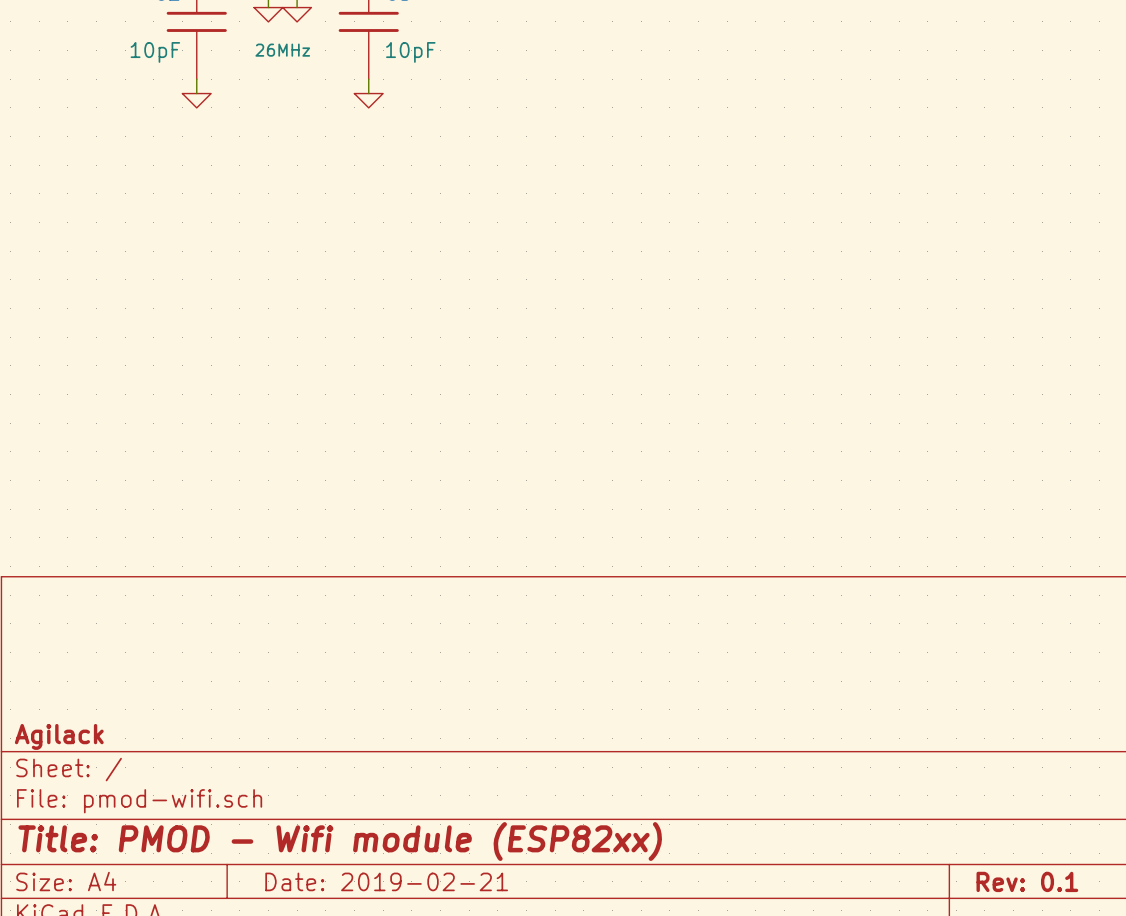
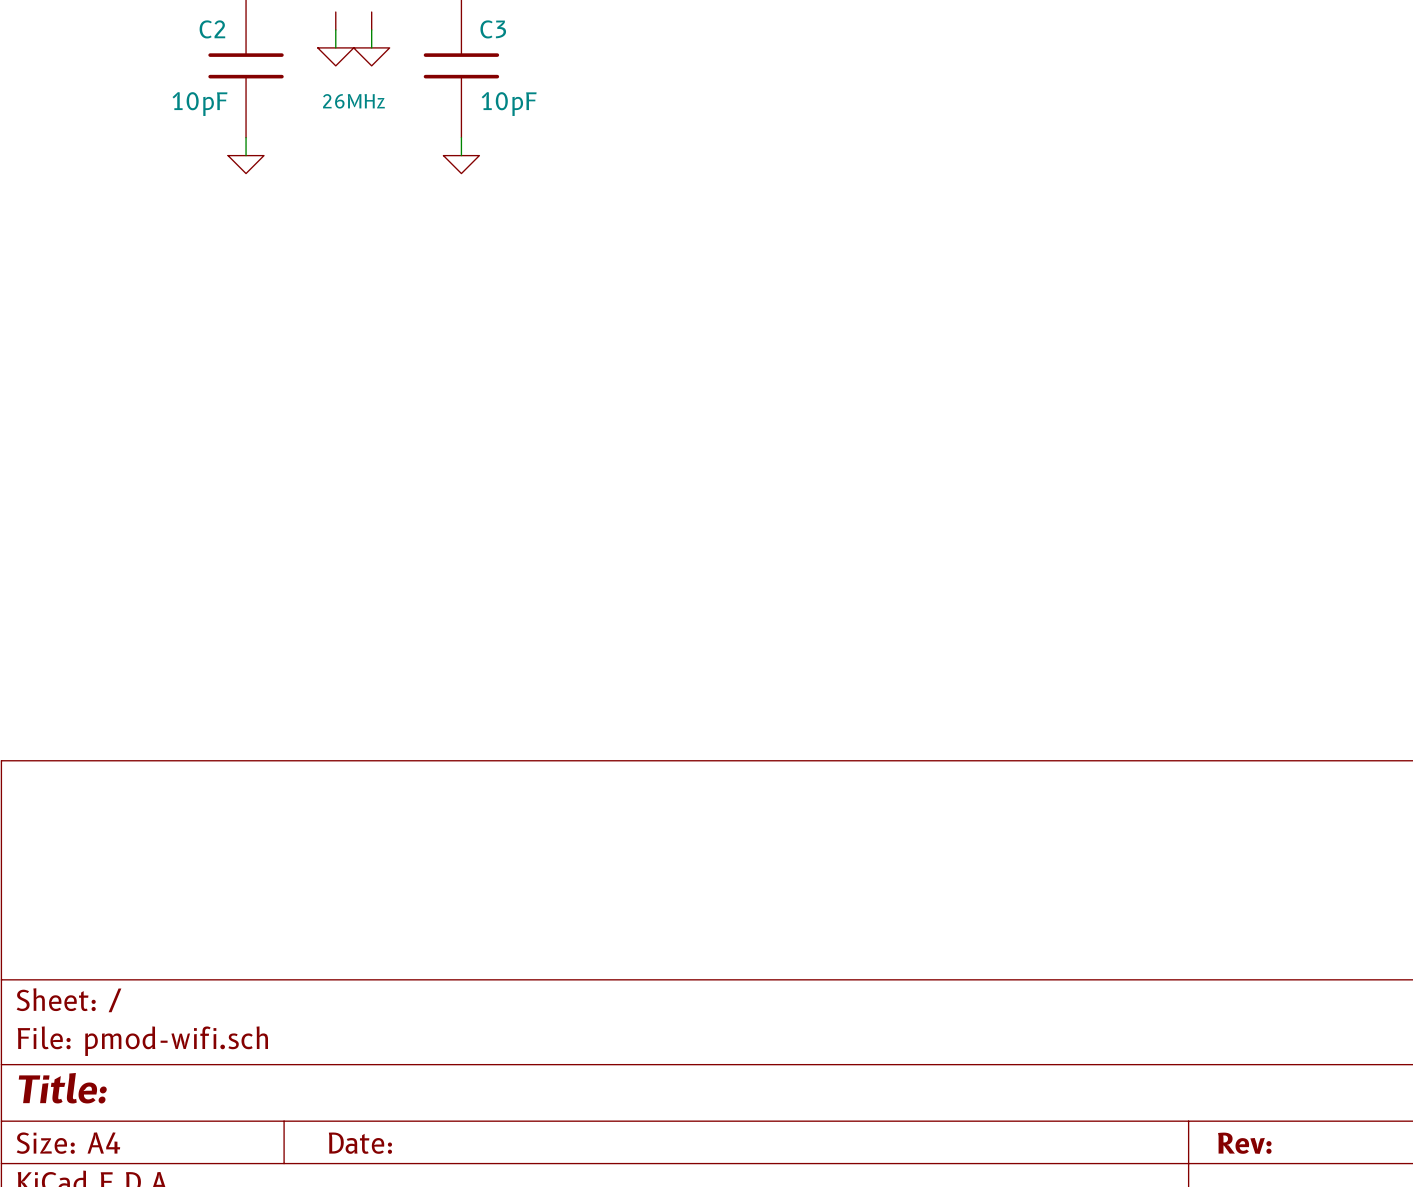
title block: Agilack (59, 736) -> none
title block: Title: PMOD - Wifi module (ESP82xx) (340, 841) -> Title: (62, 1088)
title block: Date: 2019-02-21 (386, 881) -> Date: (360, 1143)
title block: Rev: 0.1 (1027, 881) -> Rev: (1244, 1143)

